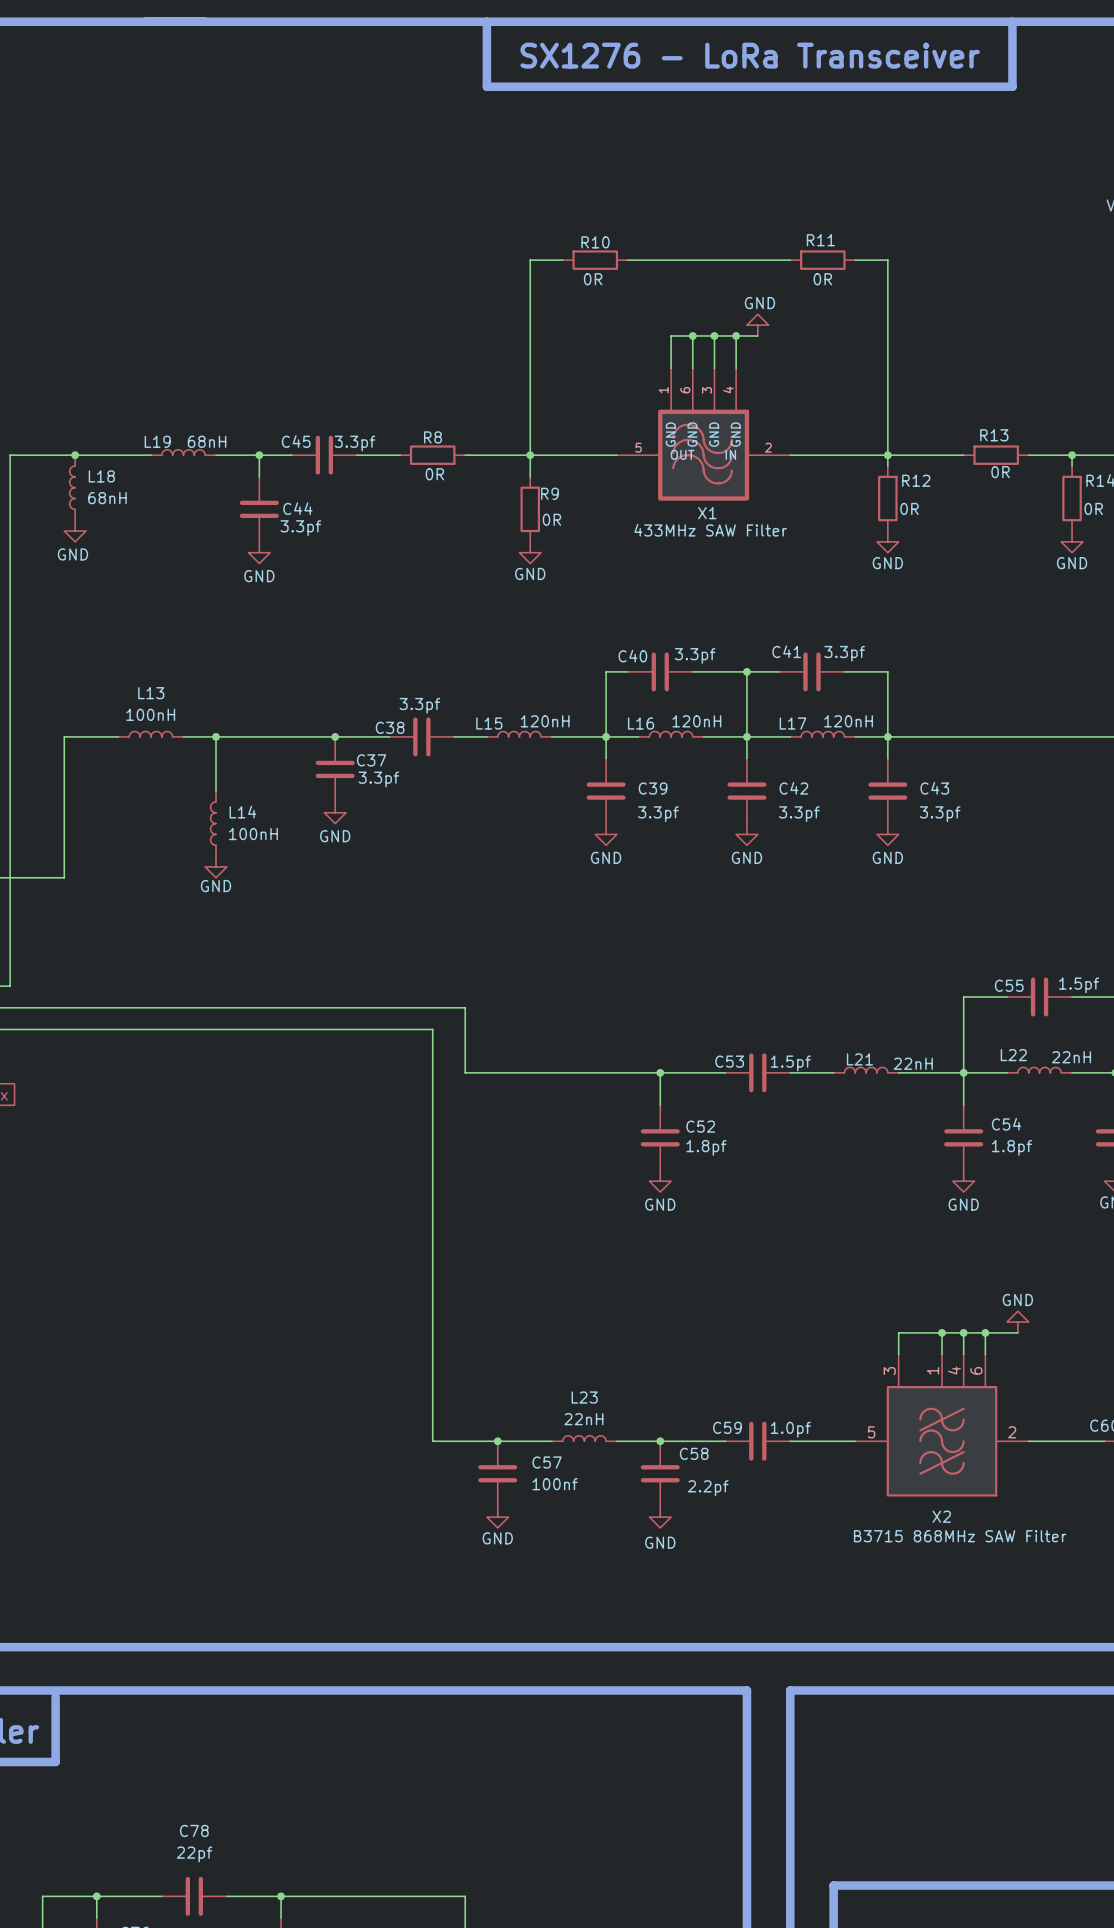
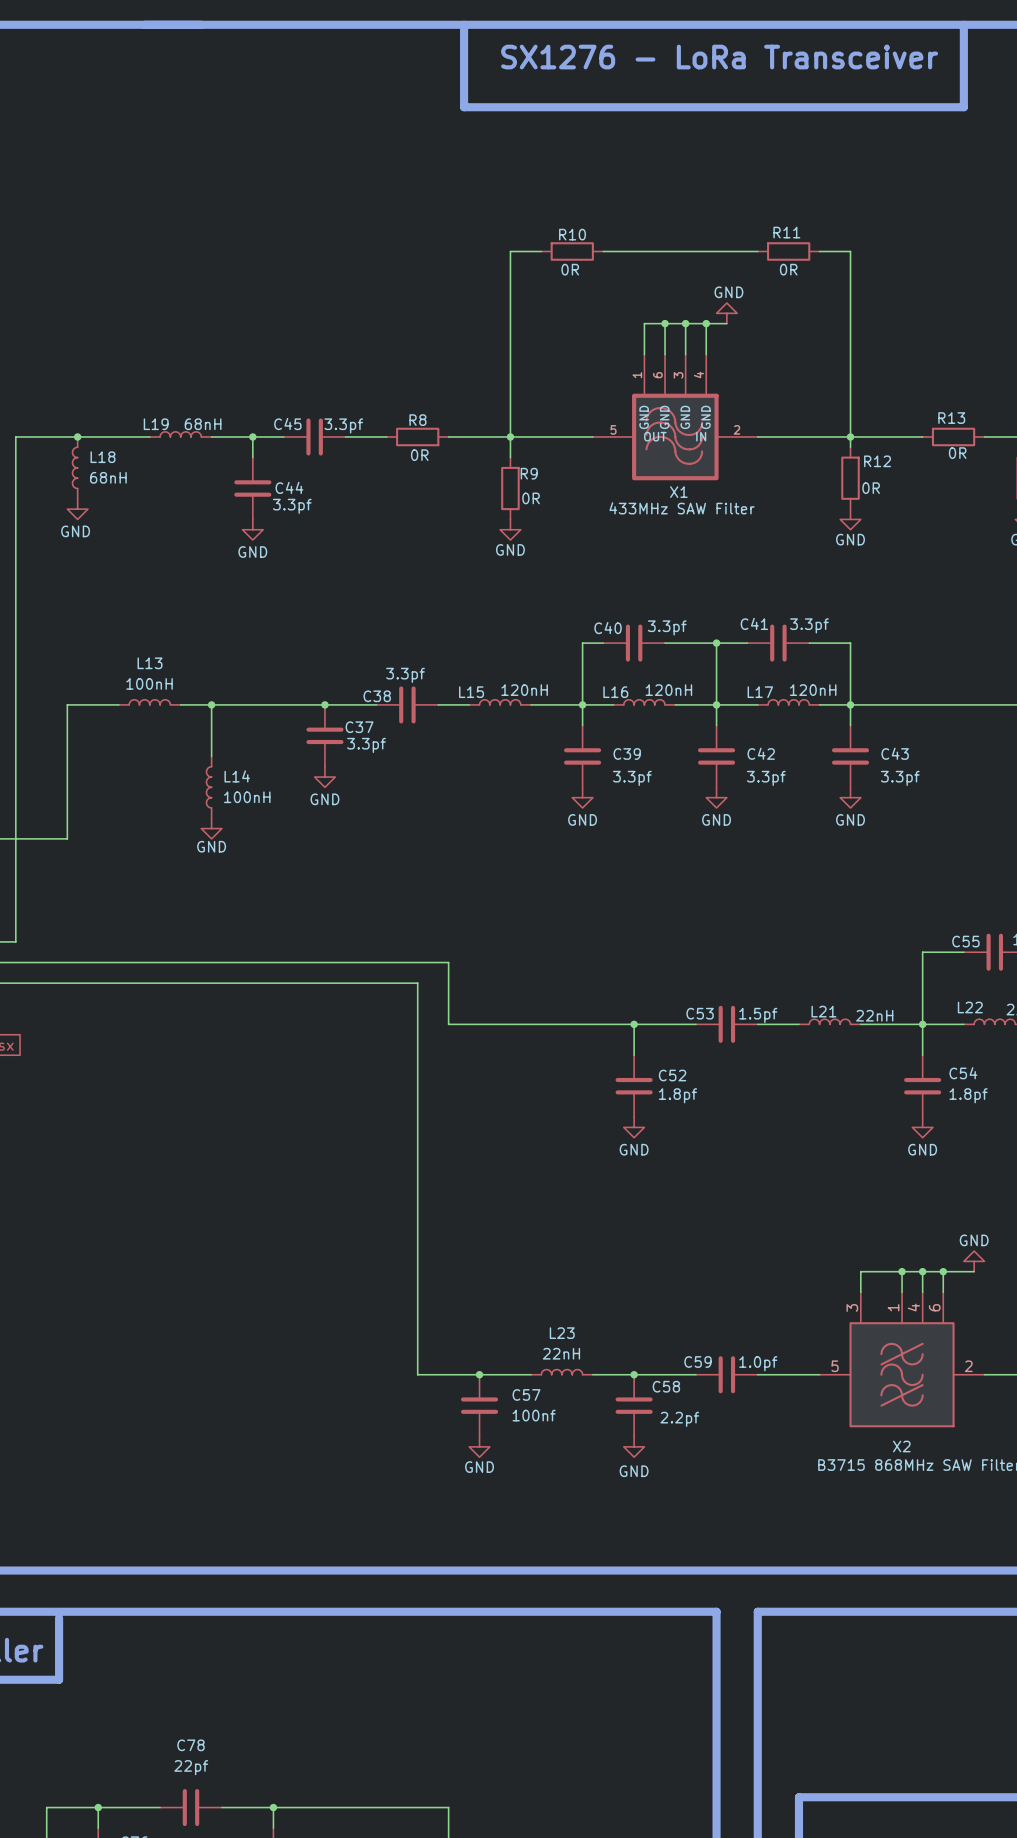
line: none -> (464, 24) (464, 107) (963, 107) (963, 24)
line: (486, 21) (486, 86) (1012, 86) (1012, 21) -> none

